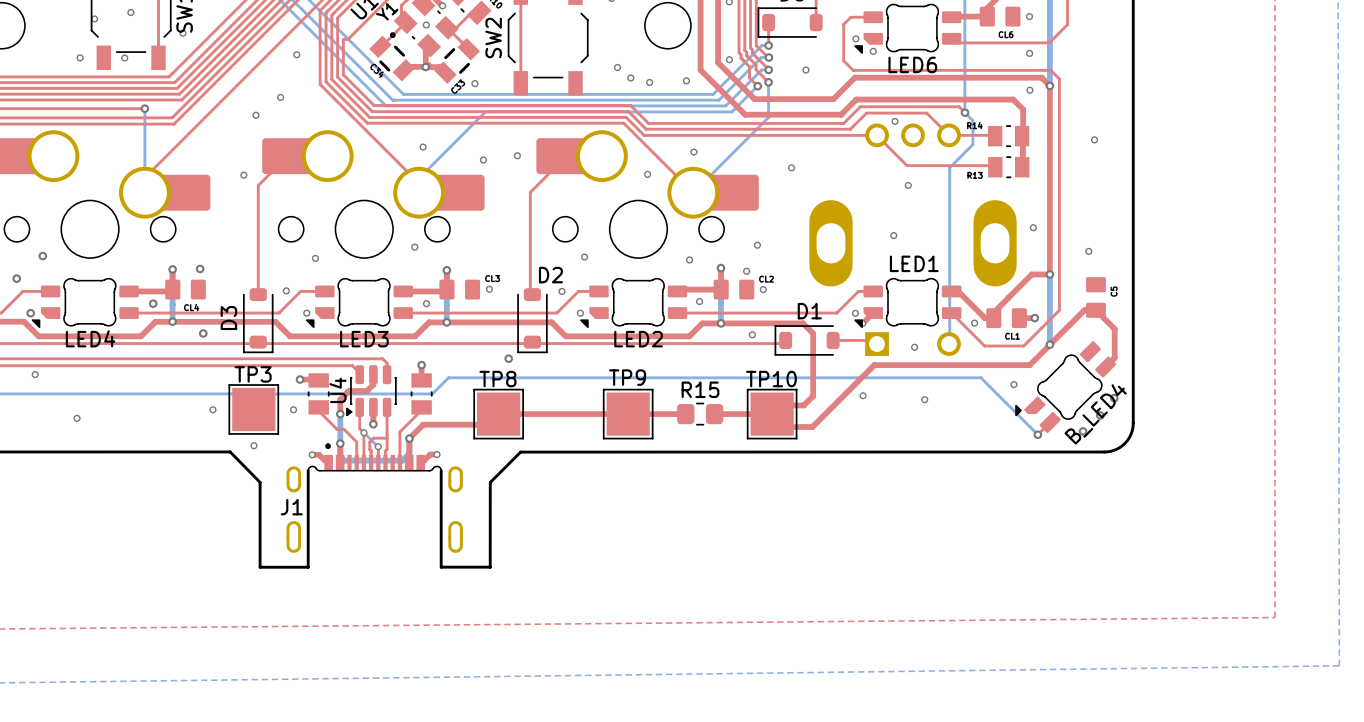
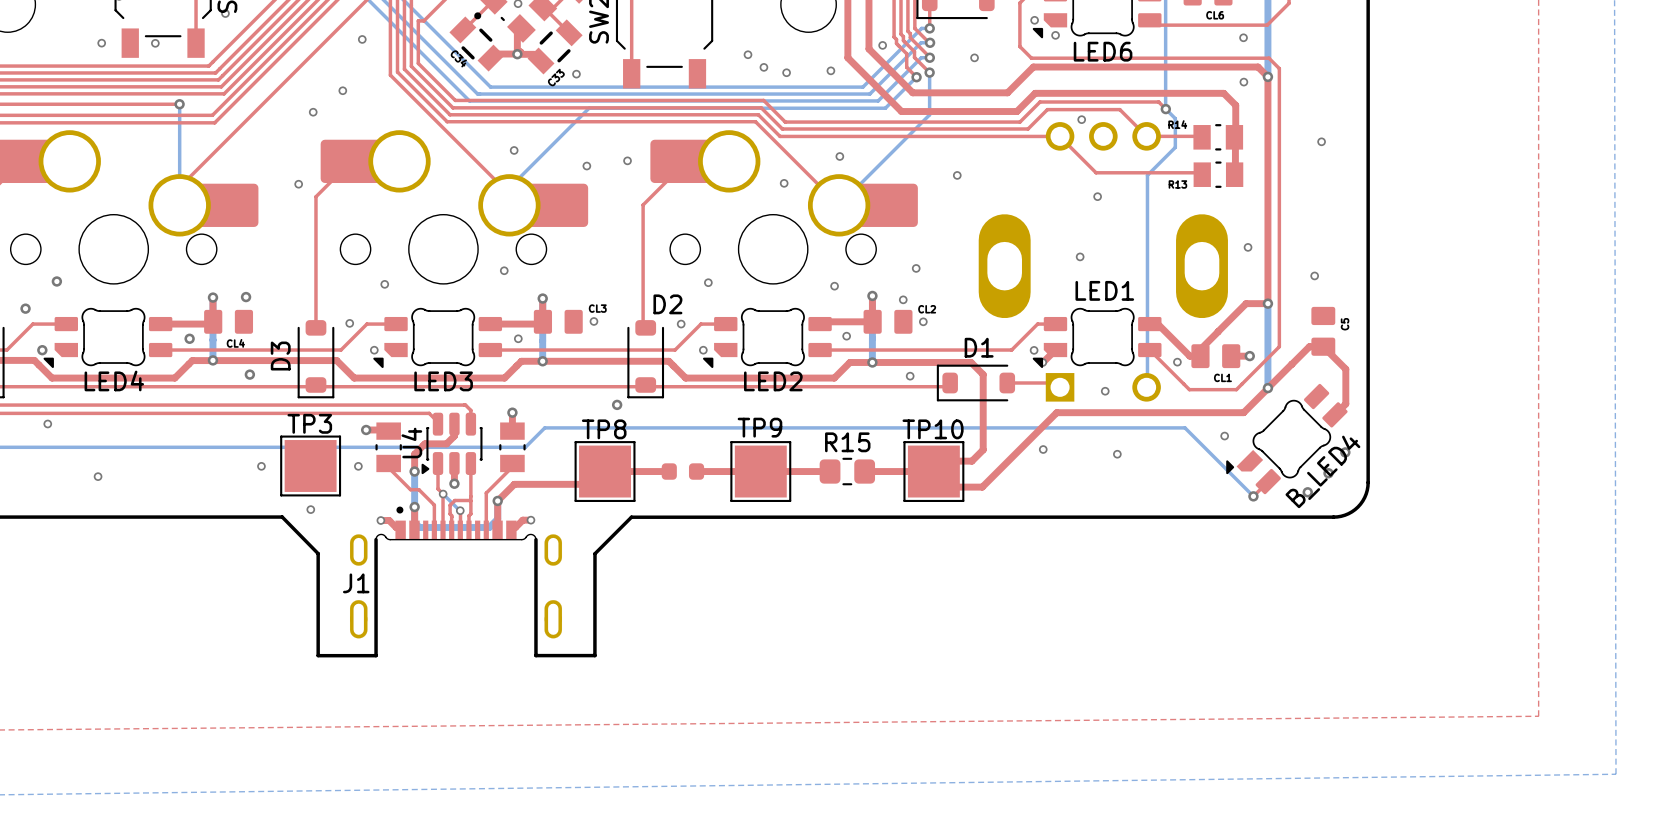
top track: (552, 414) (574, 414) -> none
part: none -> (682, 471)

